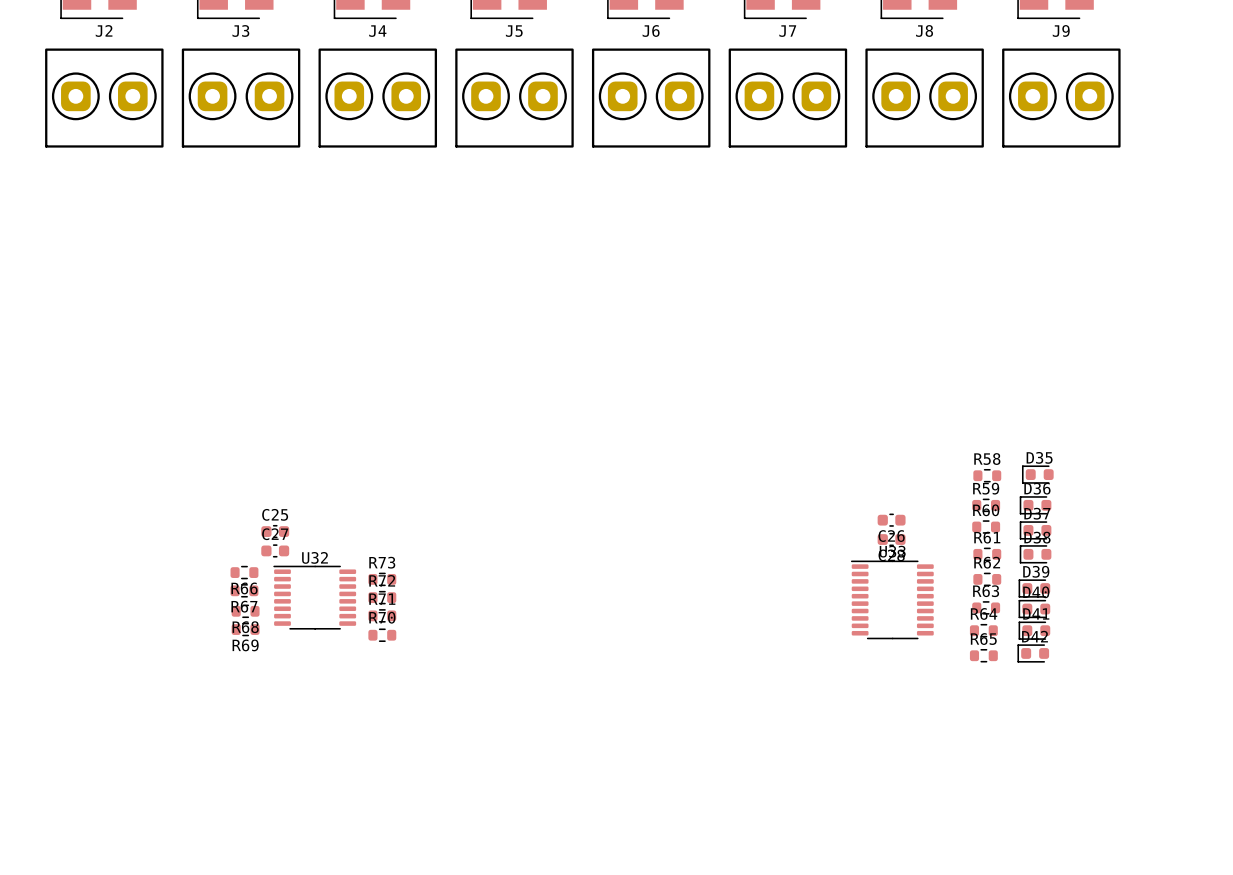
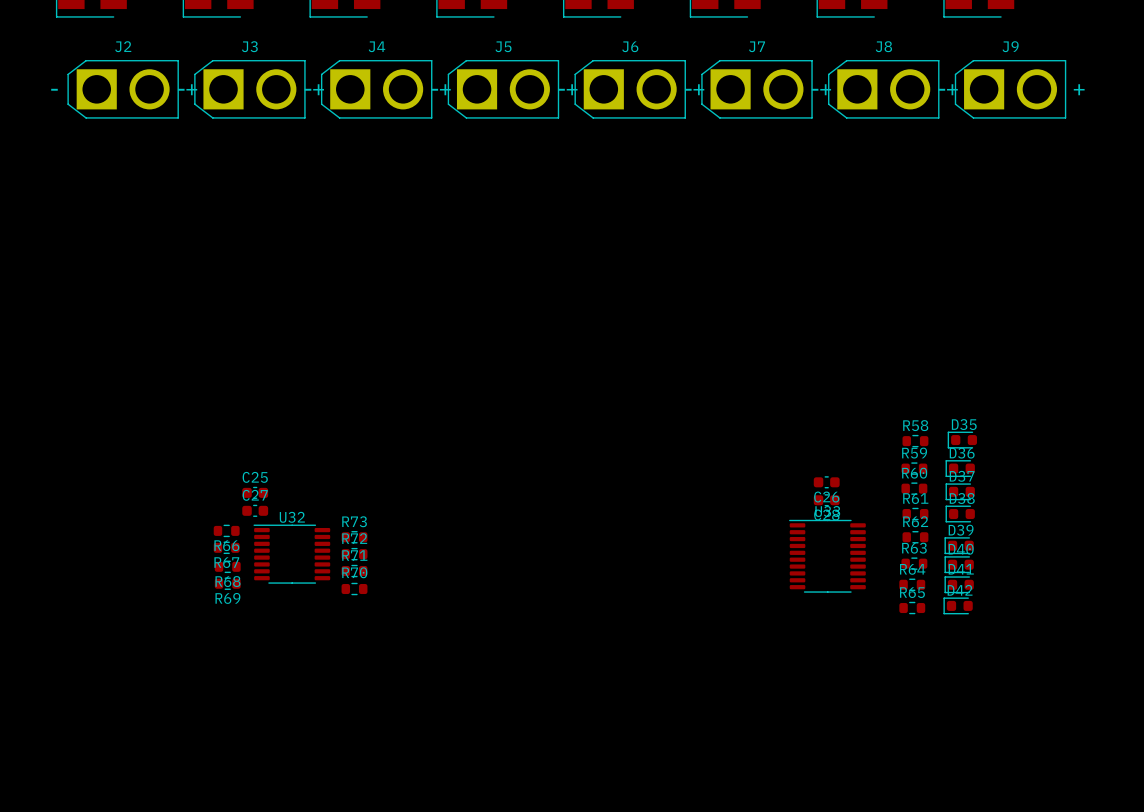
J2 footprint: [45, 48, 164, 148] -> [67, 60, 179, 119]
J3 footprint: [181, 48, 301, 148] -> [194, 60, 306, 119]
J4 footprint: [318, 48, 438, 148] -> [321, 60, 433, 119]
J5 footprint: [455, 48, 574, 148] -> [447, 60, 560, 119]
J6 footprint: [591, 48, 711, 148] -> [574, 60, 686, 119]
J7 footprint: [728, 48, 848, 148] -> [701, 60, 813, 119]
J8 footprint: [865, 48, 984, 148] -> [828, 60, 940, 119]
J9 footprint: [1002, 48, 1121, 148] -> [954, 60, 1067, 119]

